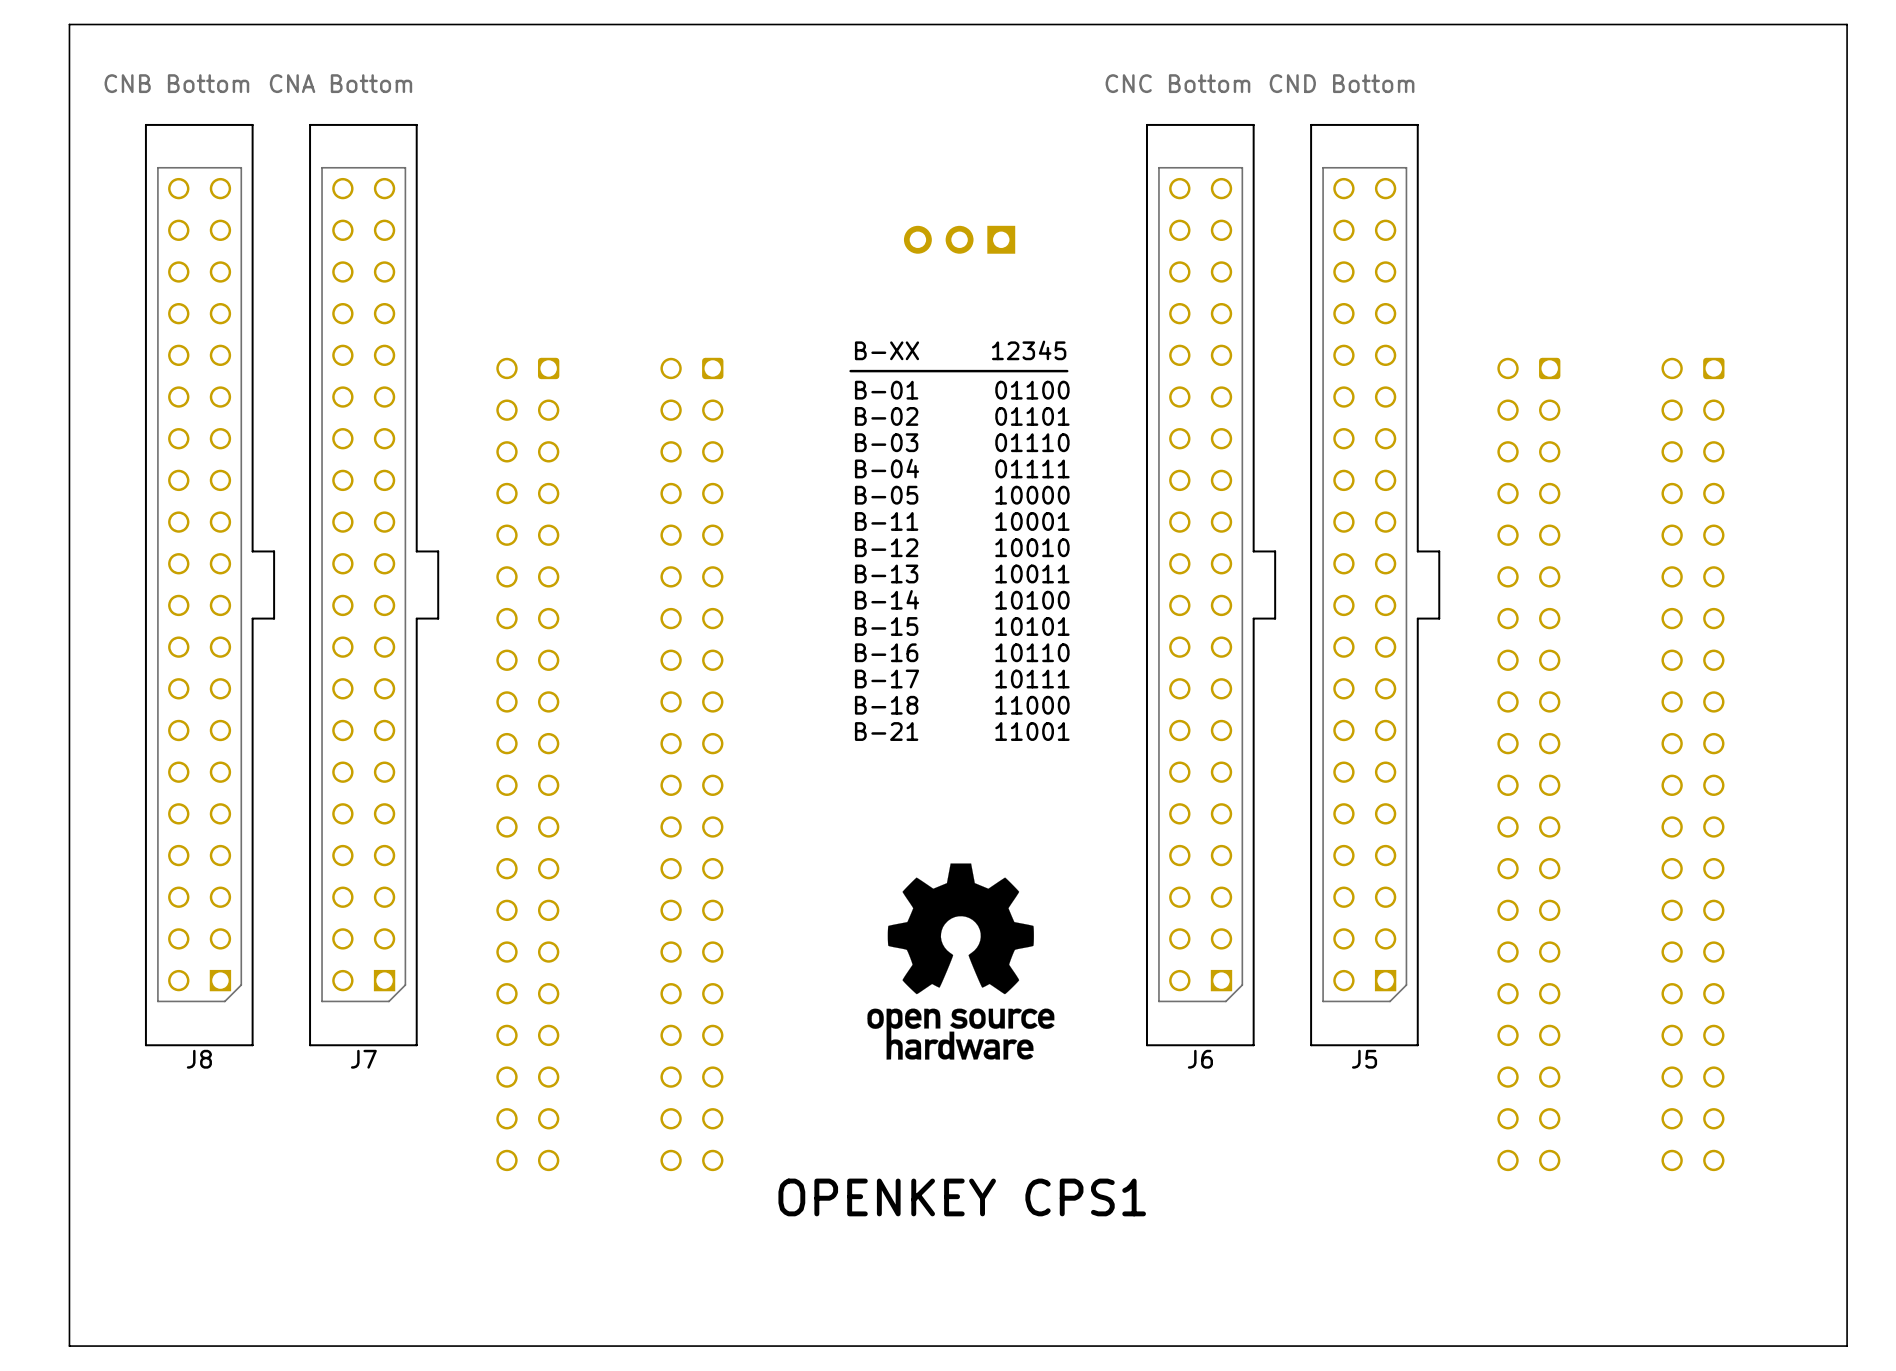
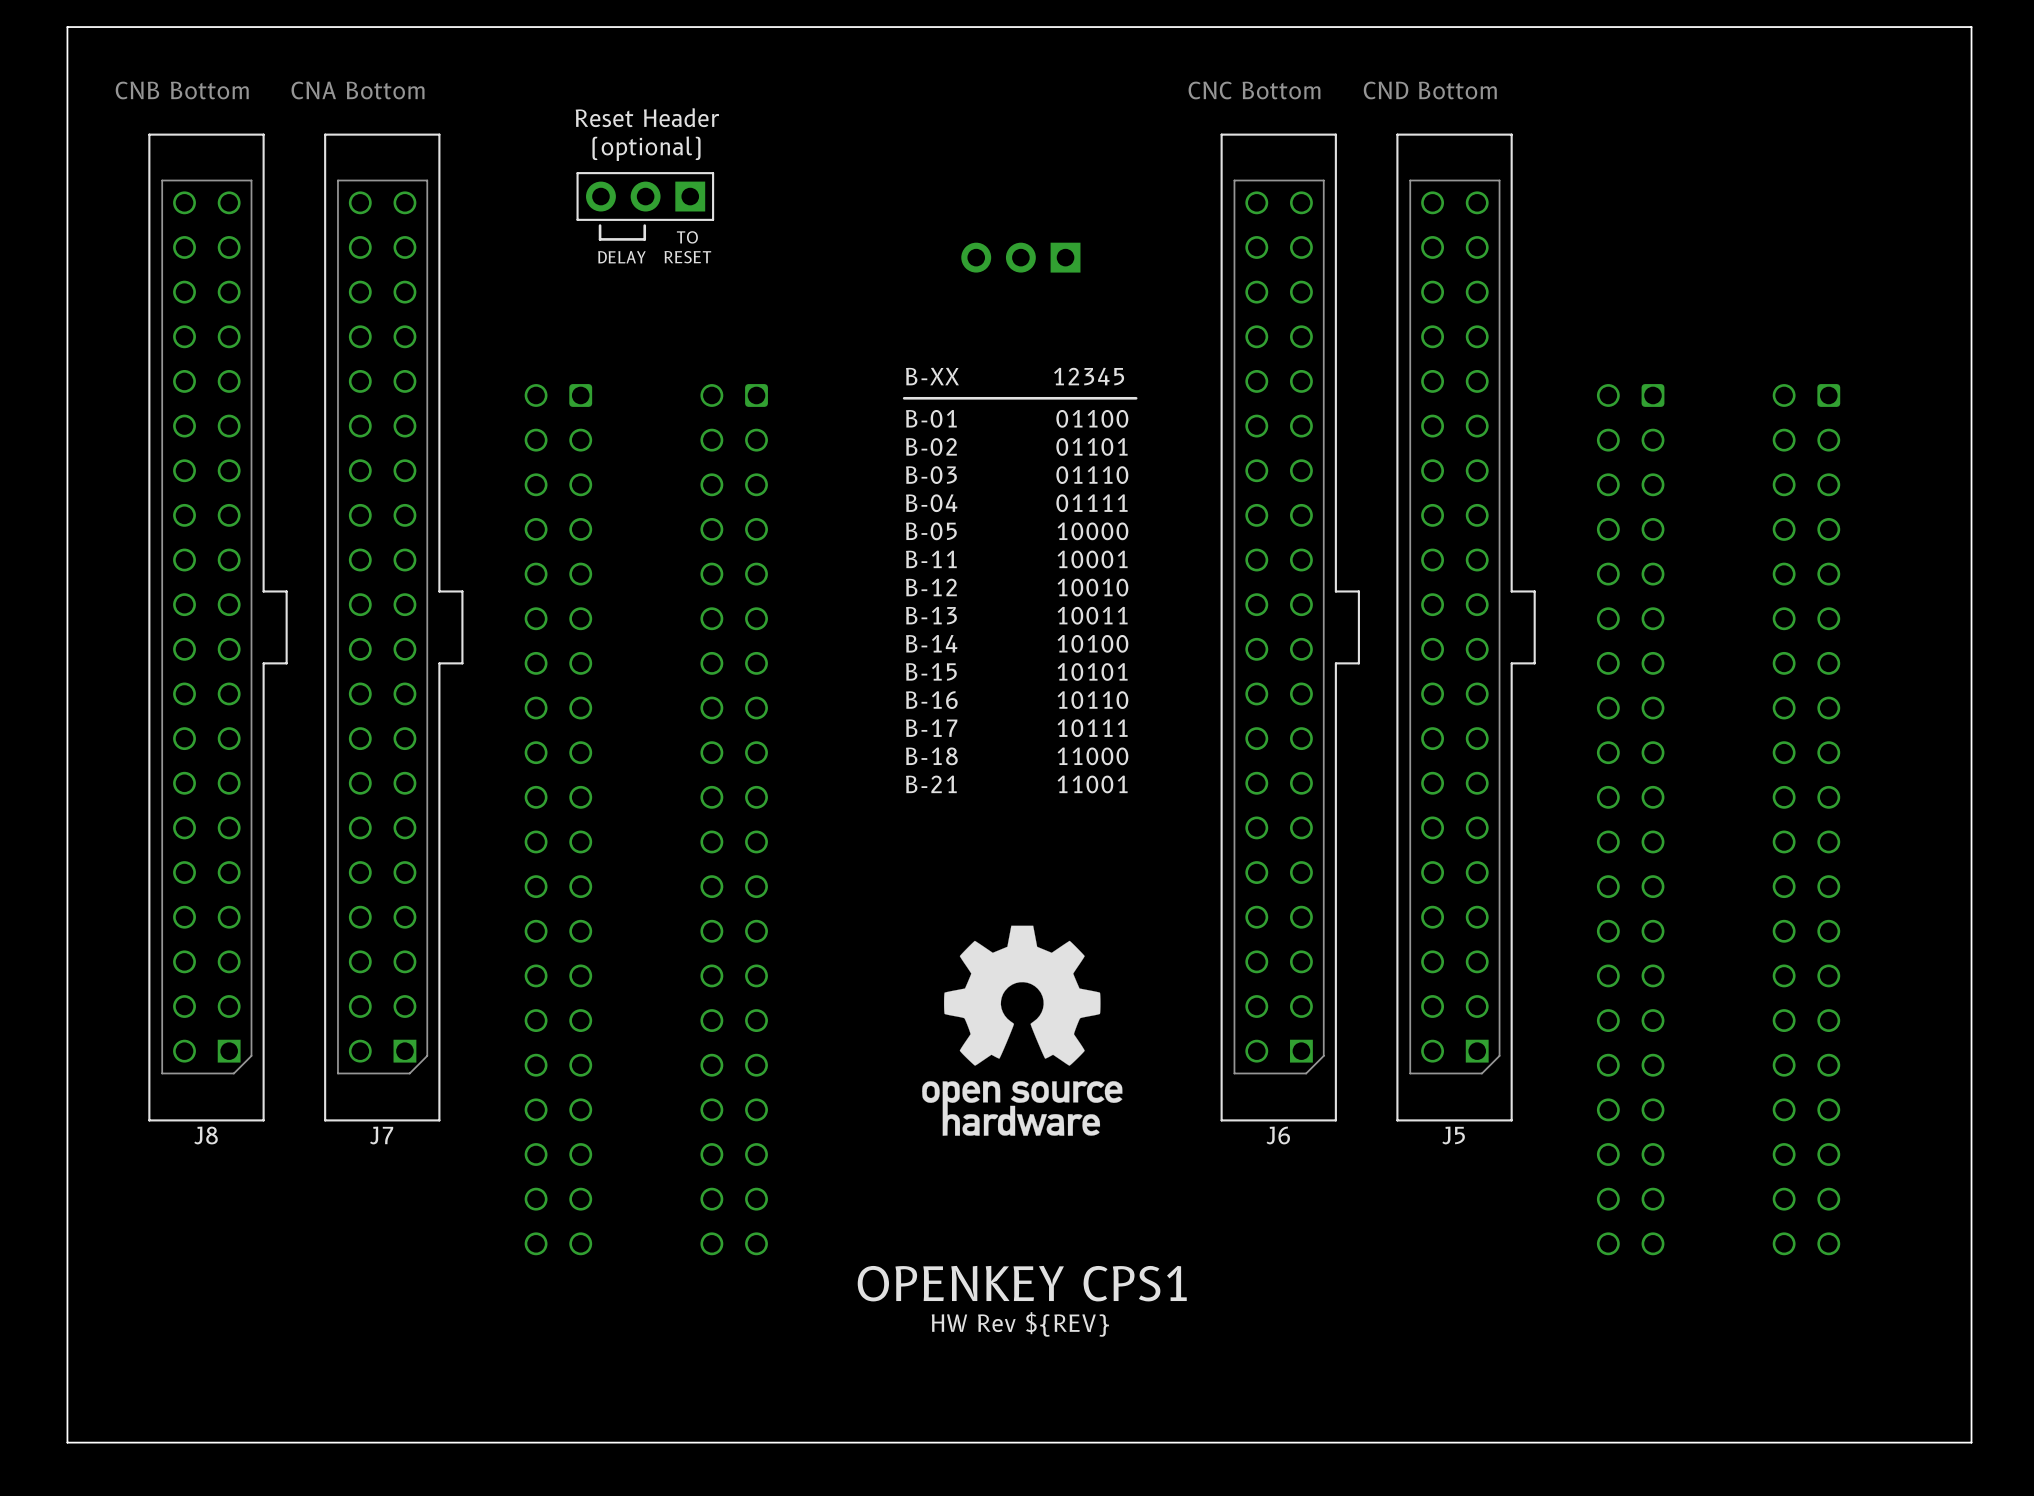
text: none -> Reset Header (647, 117)
text: none -> (optional) (646, 148)
line: none -> (713, 173) (713, 219) (577, 219) (577, 173) (713, 173)
part: none -> (645, 196)
line: none -> (644, 225) (644, 239) (600, 239) (600, 225)
text: none -> TO (687, 237)
text: none -> DELAY (621, 257)
text: none -> RESET (687, 257)
text: none -> HW Rev ${REV} (1020, 1324)

